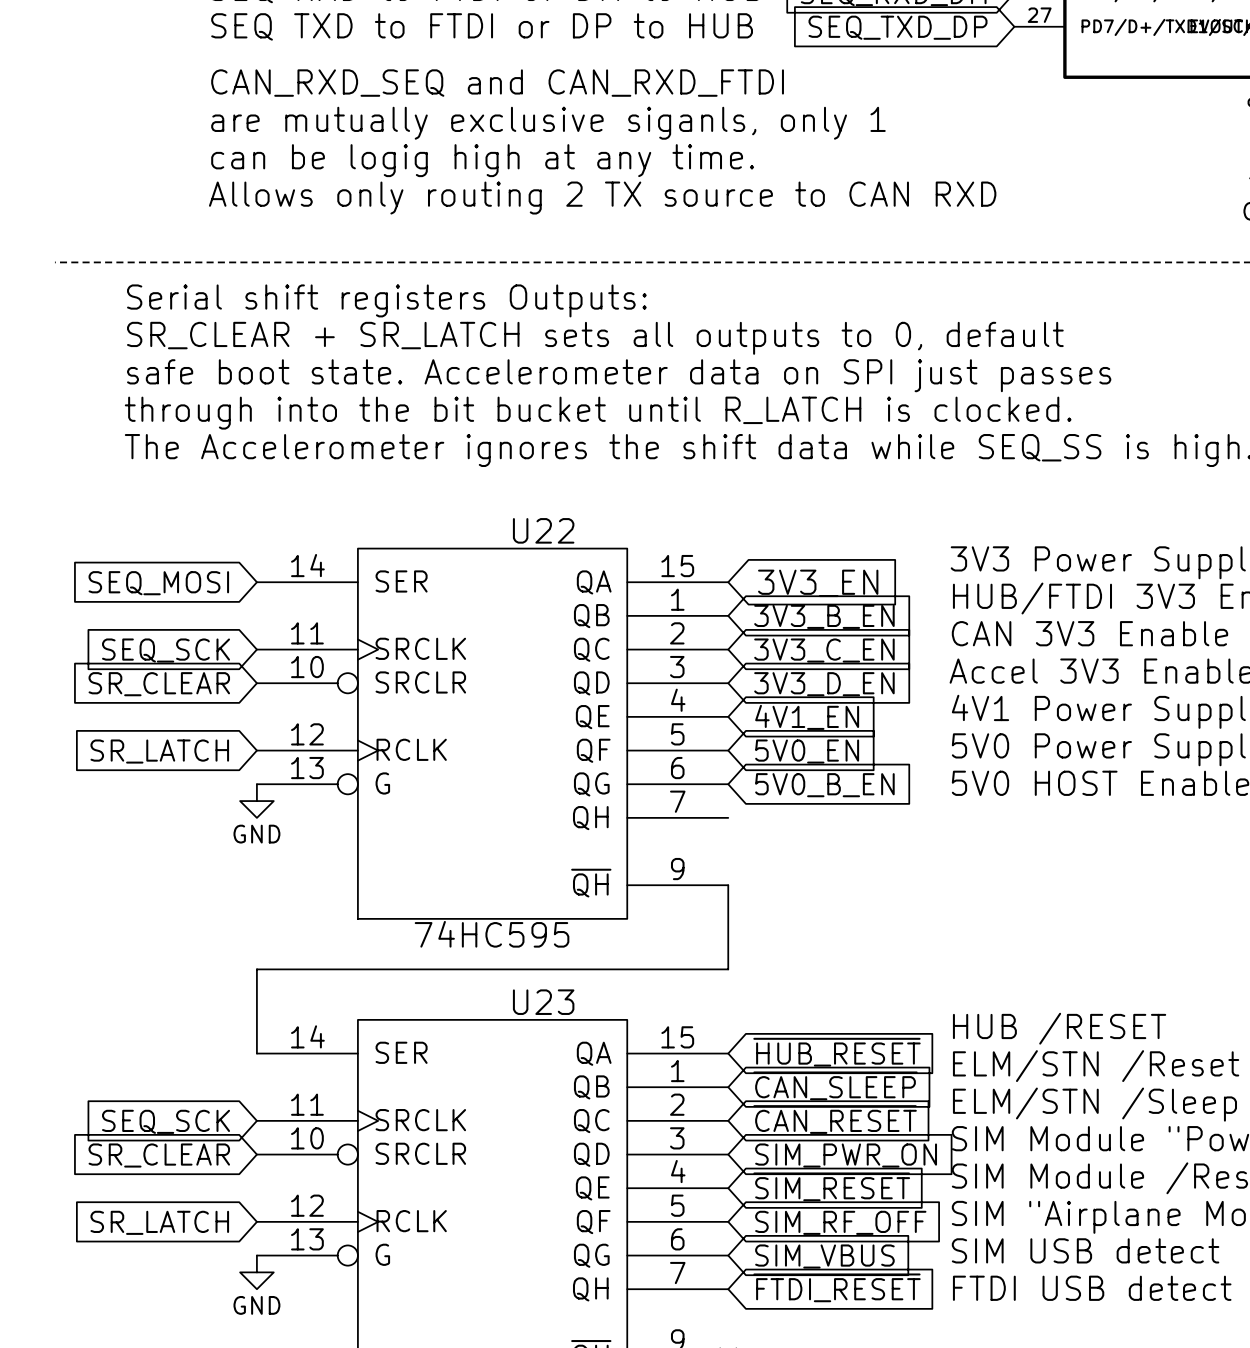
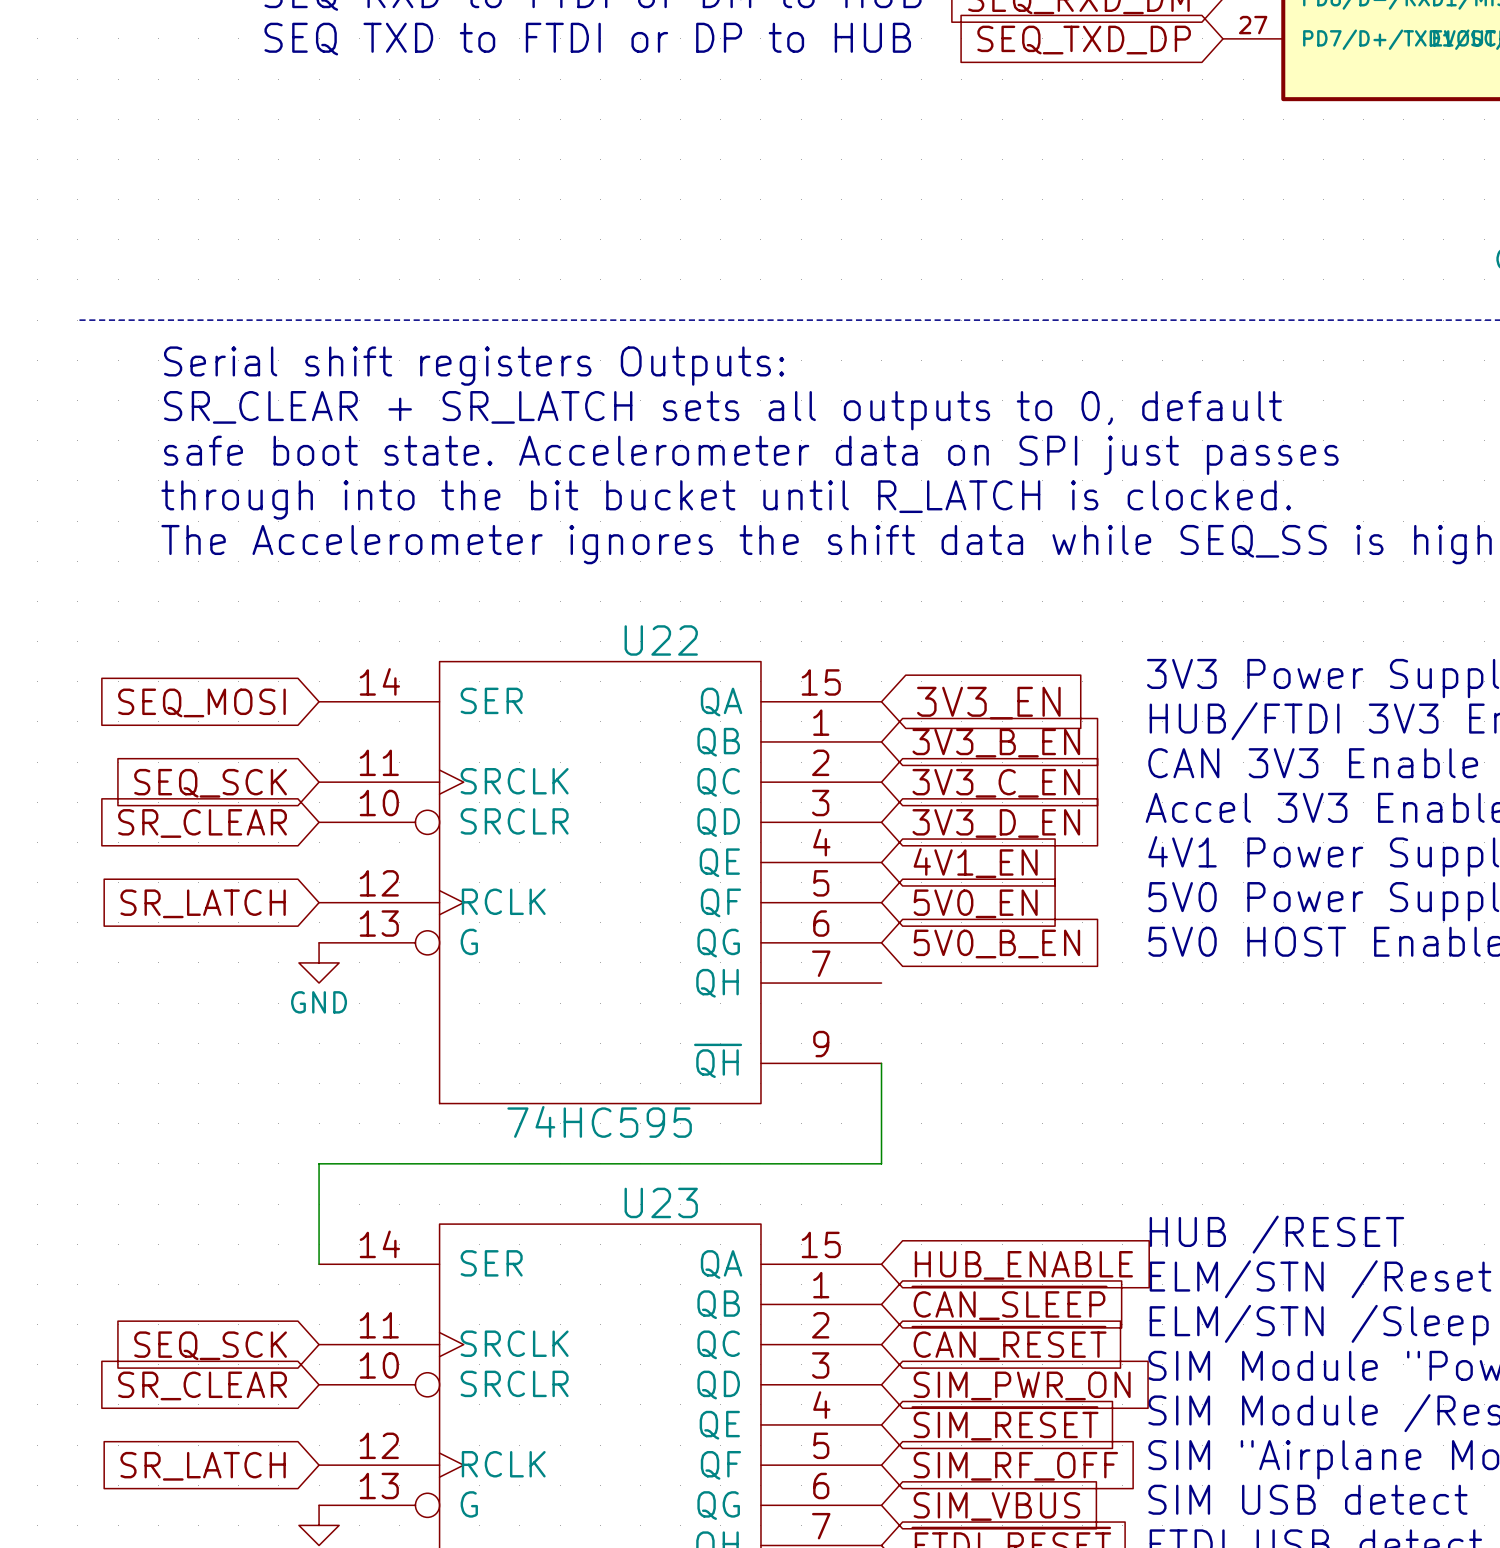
text: CAN_RXD_SEQ and CAN_RXD_FTDI (497, 83) -> none
text: are mutually exclusive siganls, only 1 (548, 123) -> none
text: can be logig high at any time. (482, 160) -> none
text: Allows only routing 2 TX source to CAN RXD (602, 198) -> none
global label: ~{HUB_RESET} (836, 1052) -> HUB_ENABLE (1023, 1265)

